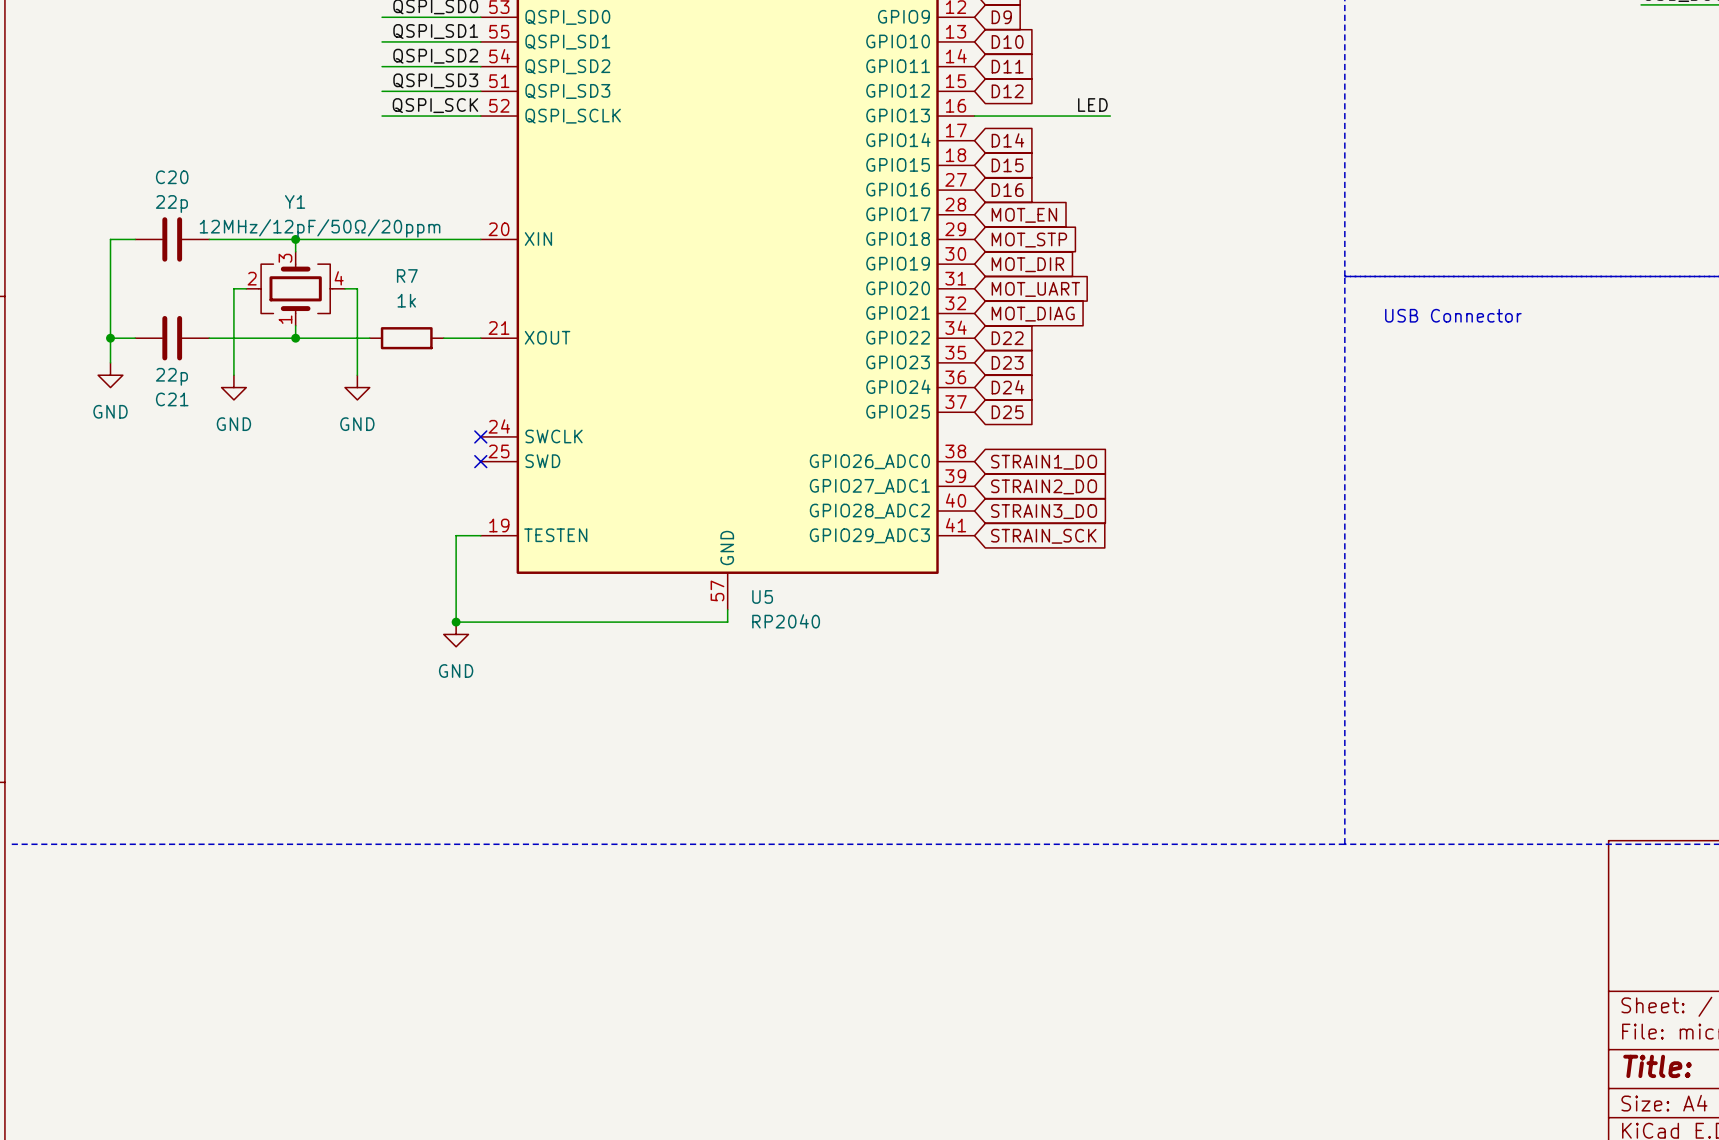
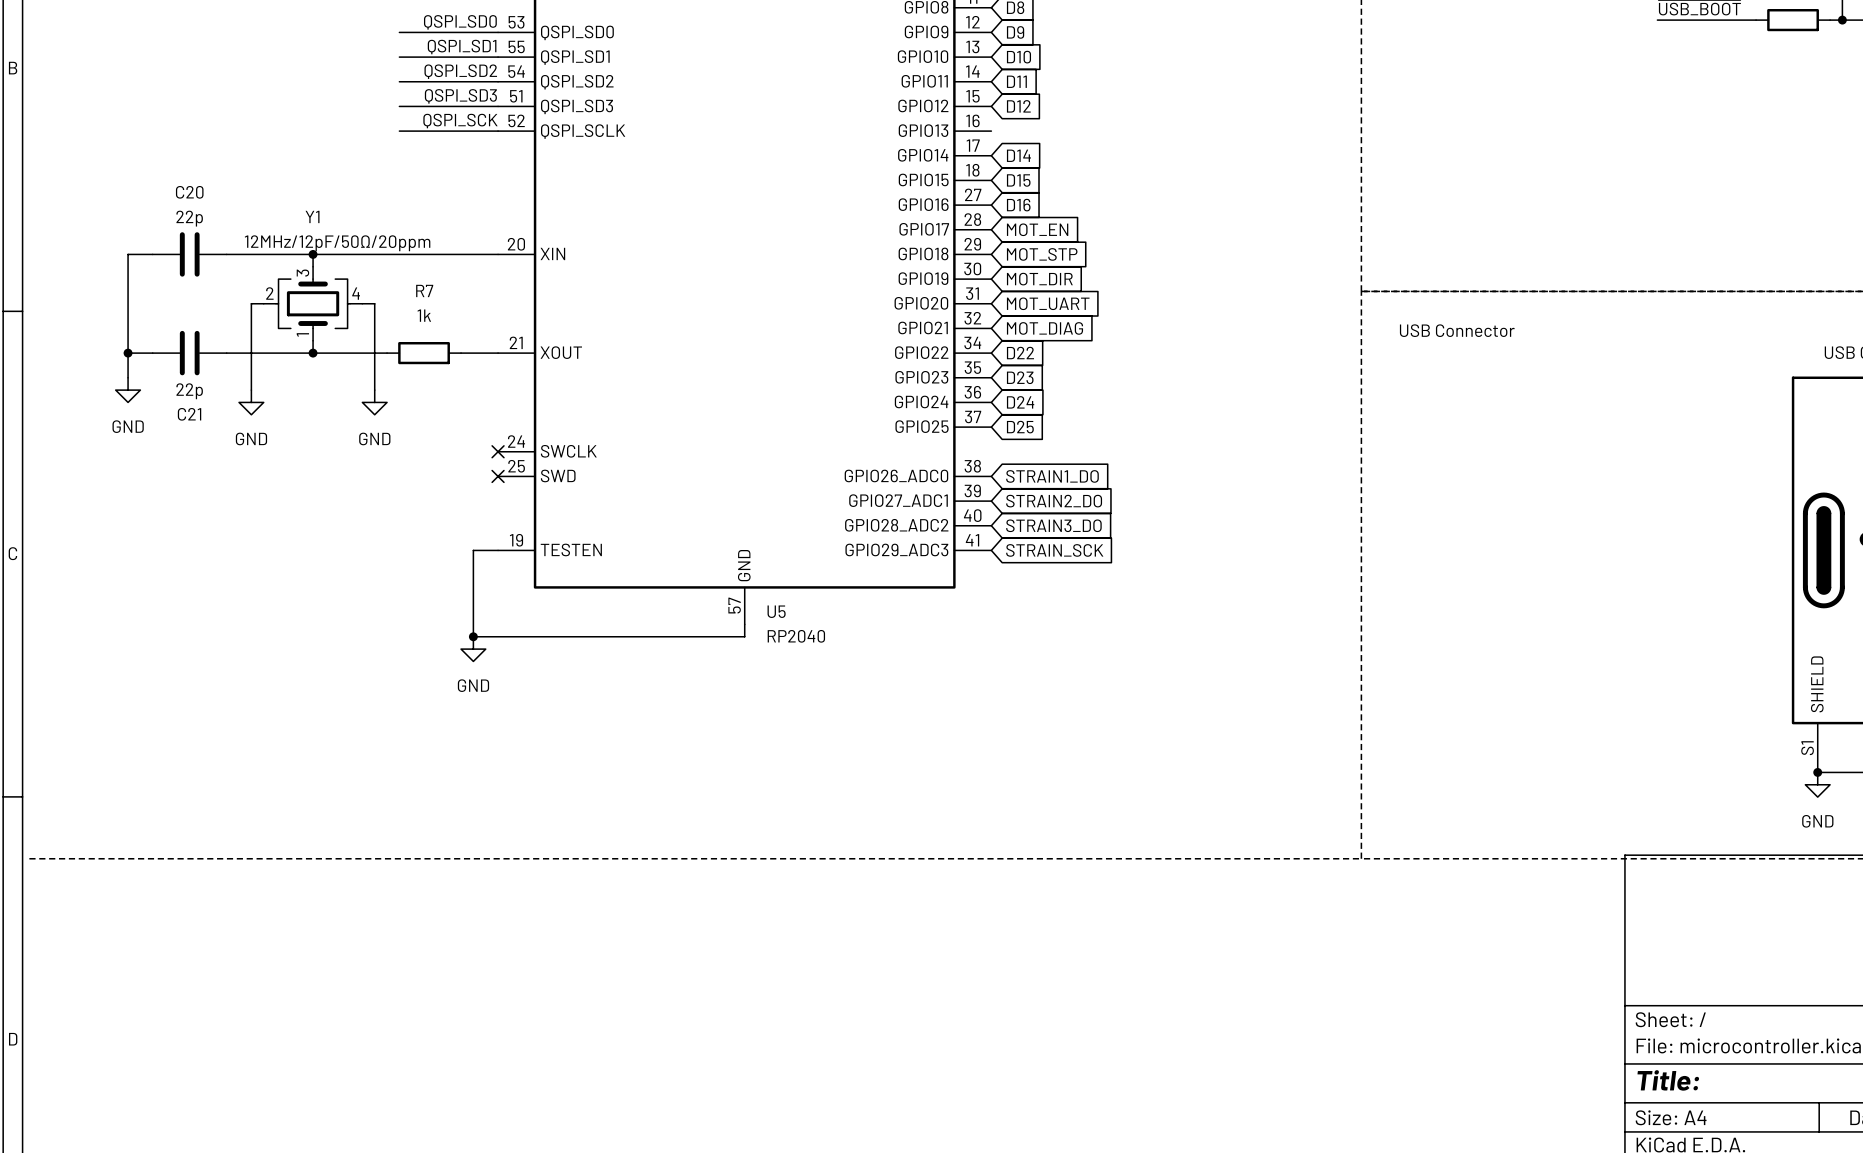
label: LED (1092, 105) -> none
wire: (974, 116) (1110, 116) -> none

